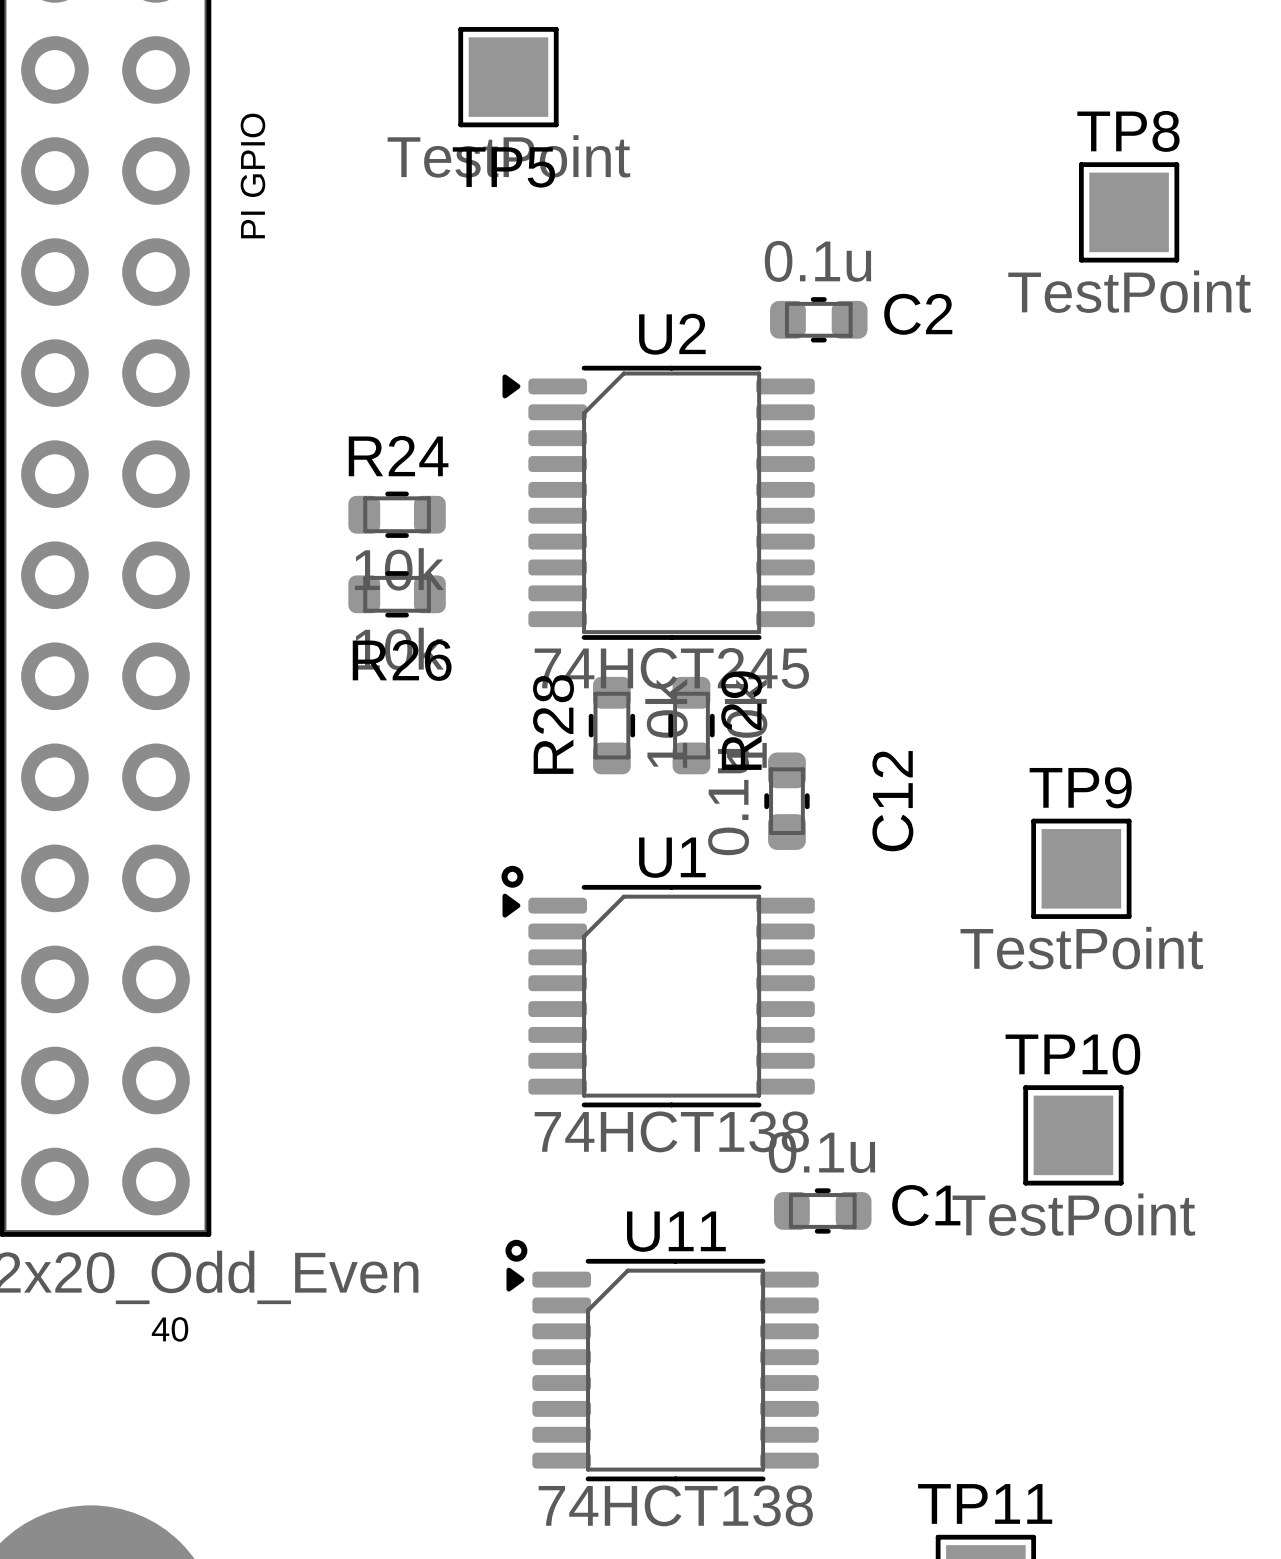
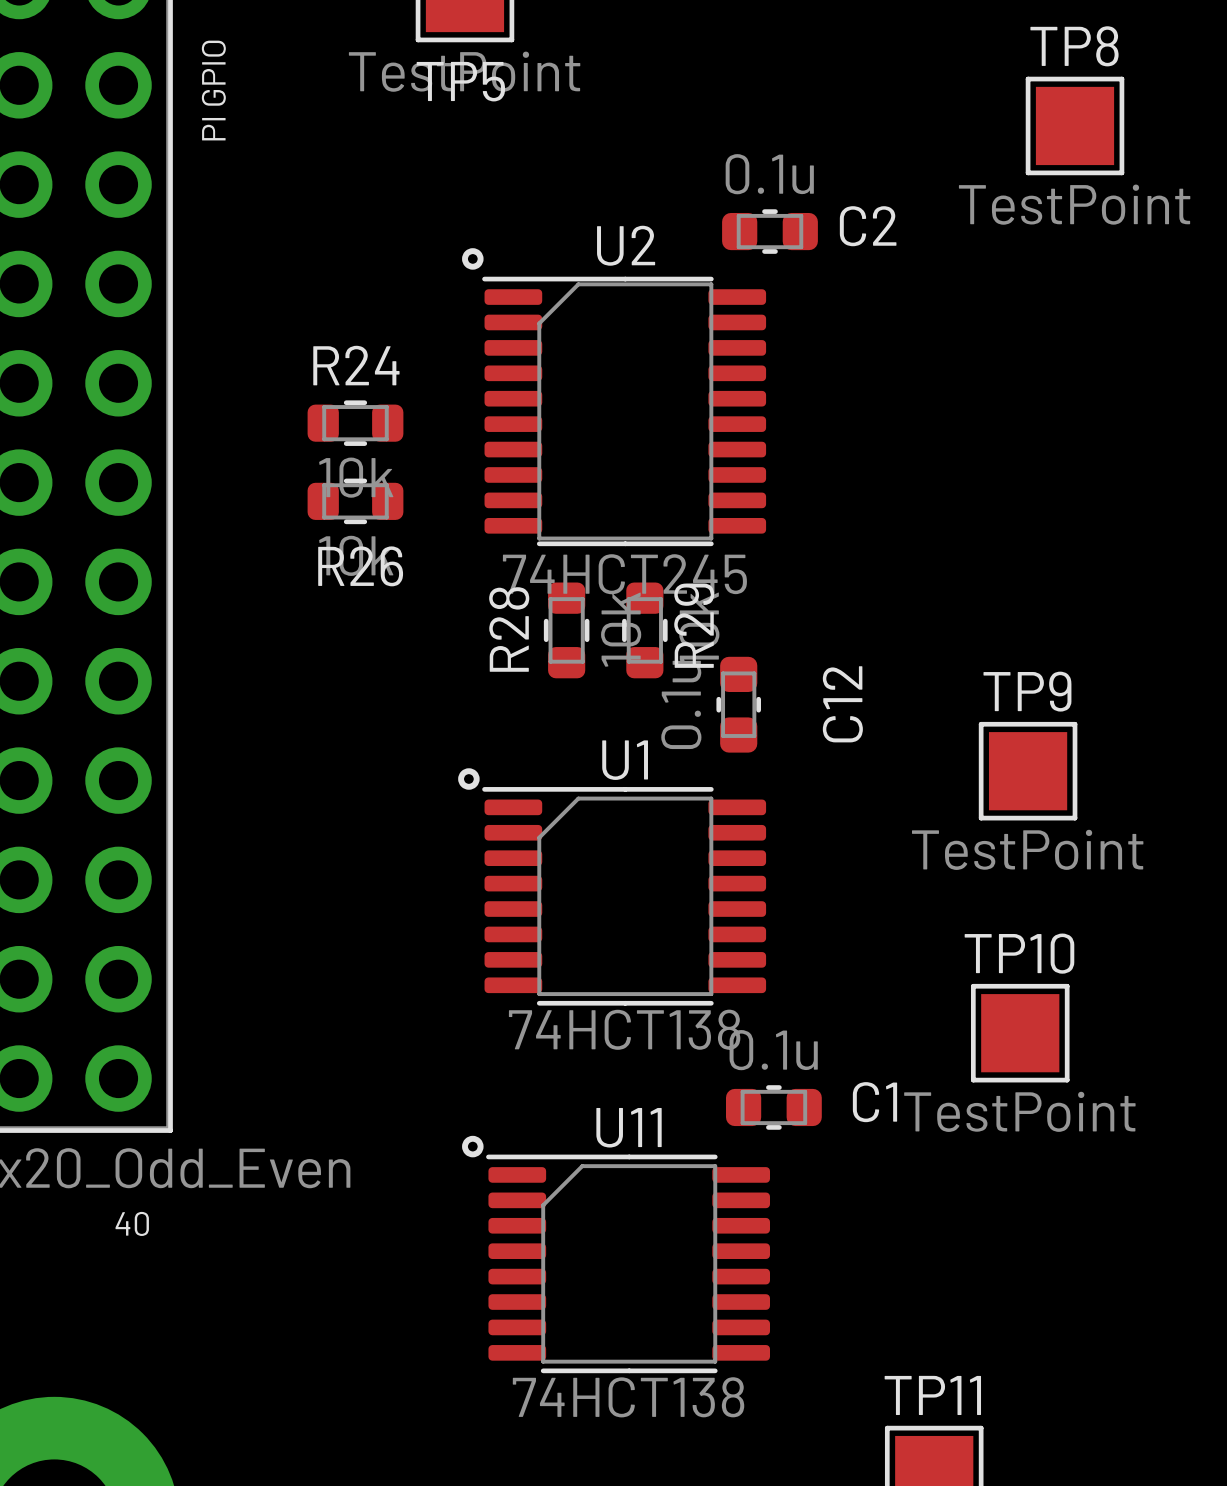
drawing: none -> [462, 248, 484, 270]
U2 footprint: [502, 365, 815, 640] -> [482, 276, 767, 547]
U1 footprint: [502, 884, 815, 1108] -> [482, 787, 767, 1006]
U11 footprint: [506, 1258, 819, 1482] -> [486, 1154, 770, 1374]

